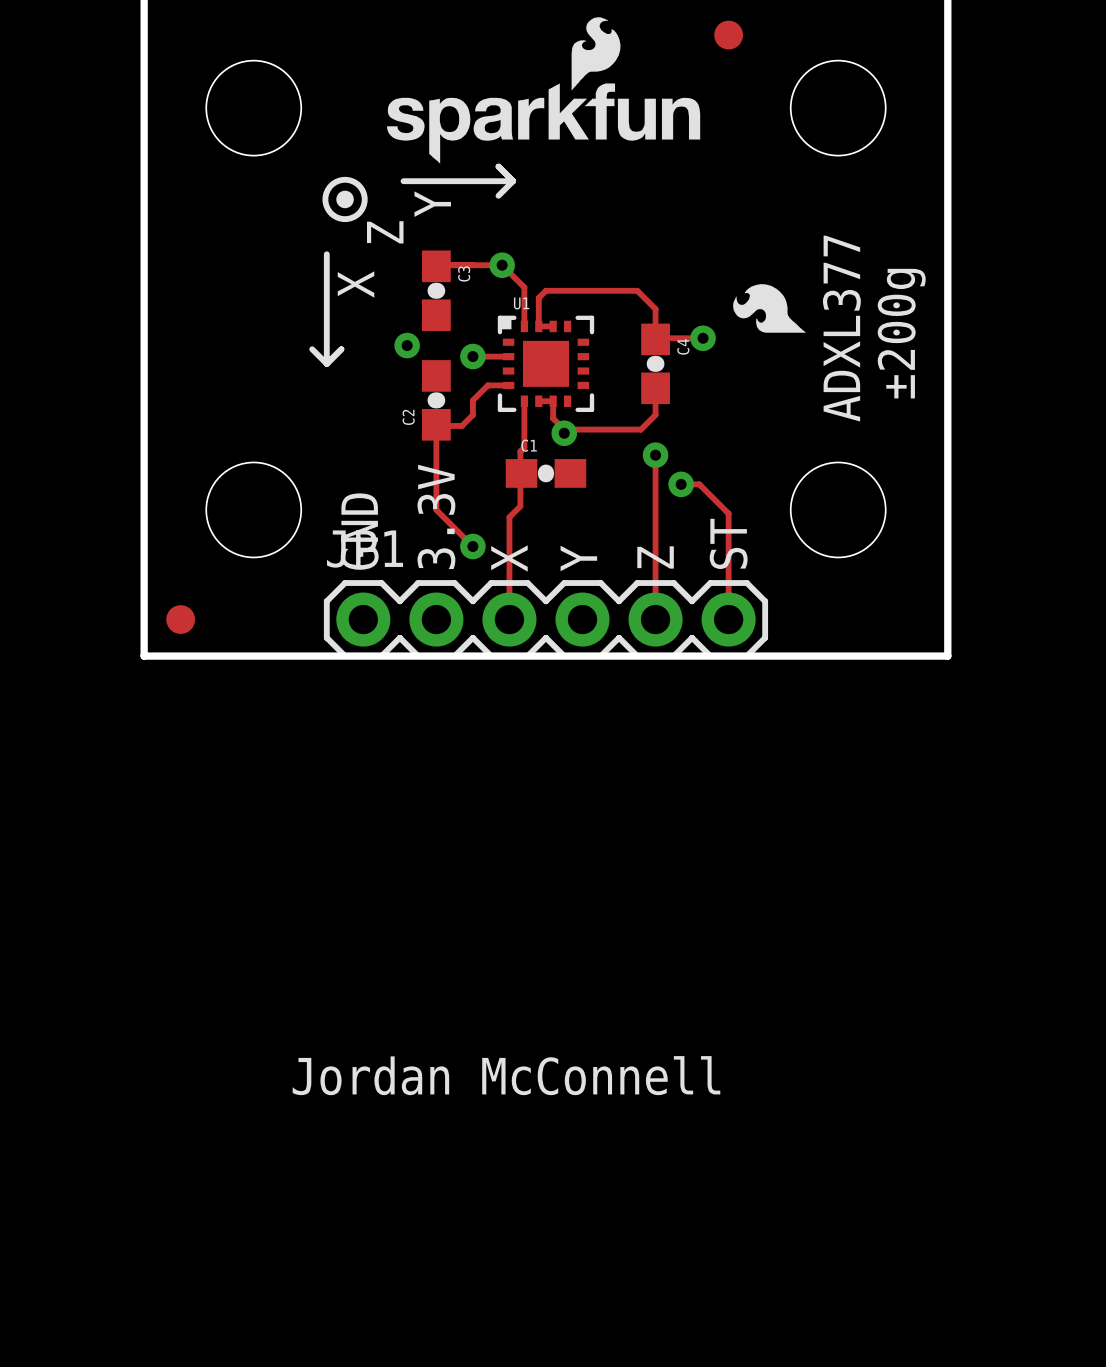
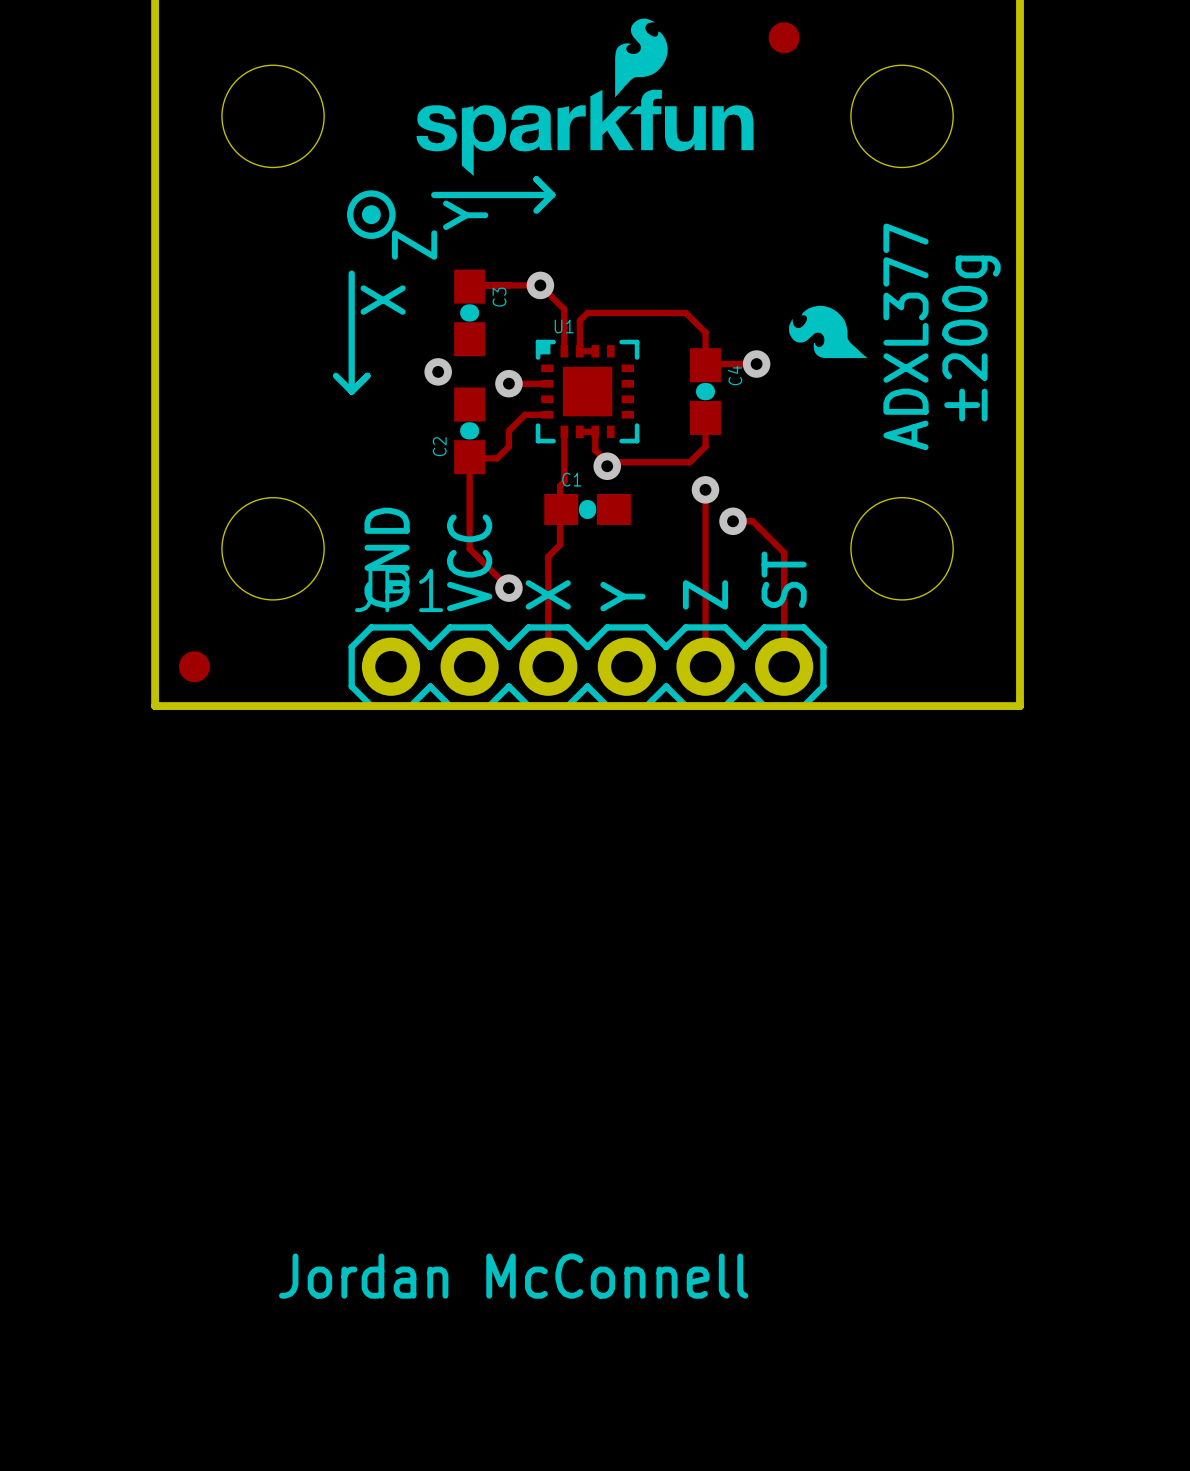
text: 3.3V (436, 516) -> VCC (469, 562)
text position: Jordan McConnell (506, 1075) -> Jordan McConnell (513, 1276)

